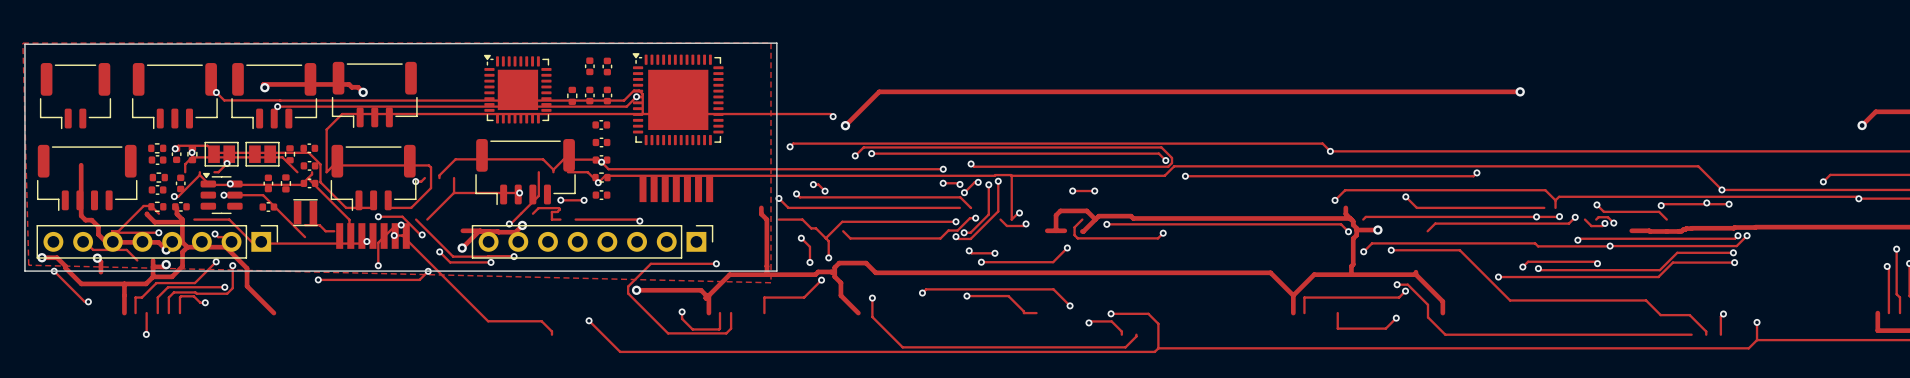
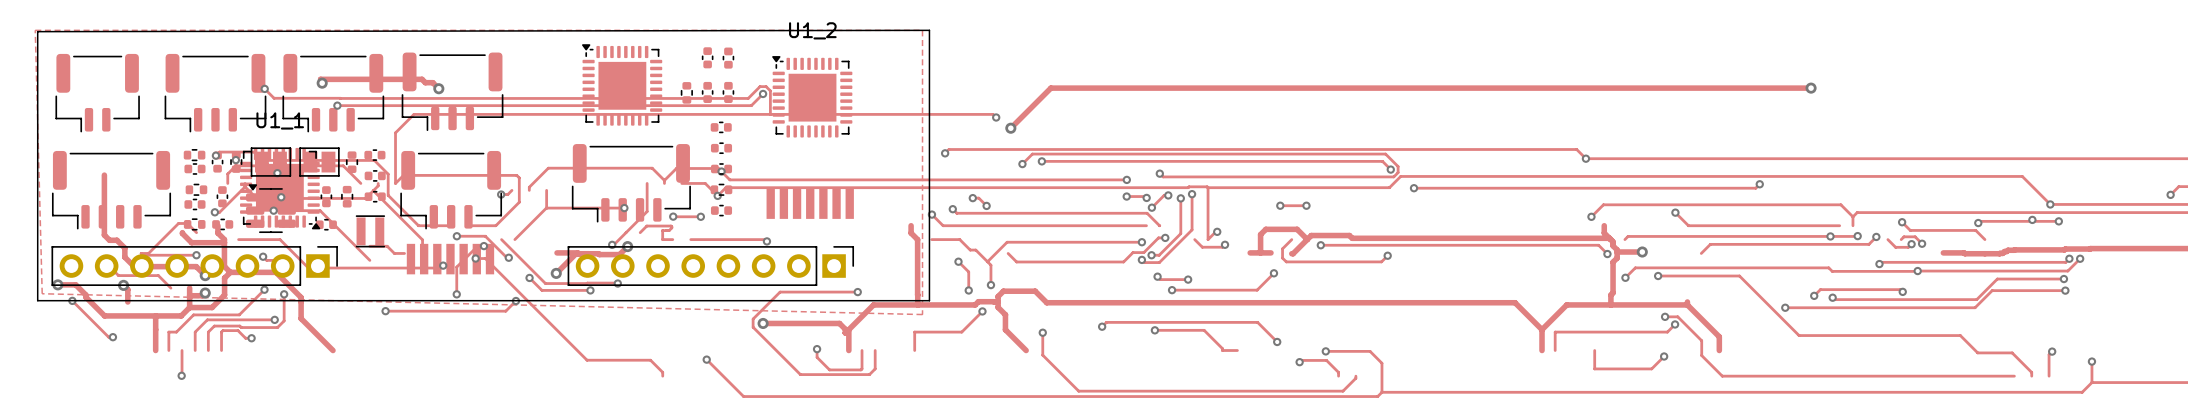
part: (678, 99) -> none
U1_2: none -> (812, 96)
U1_1: none -> (280, 188)

